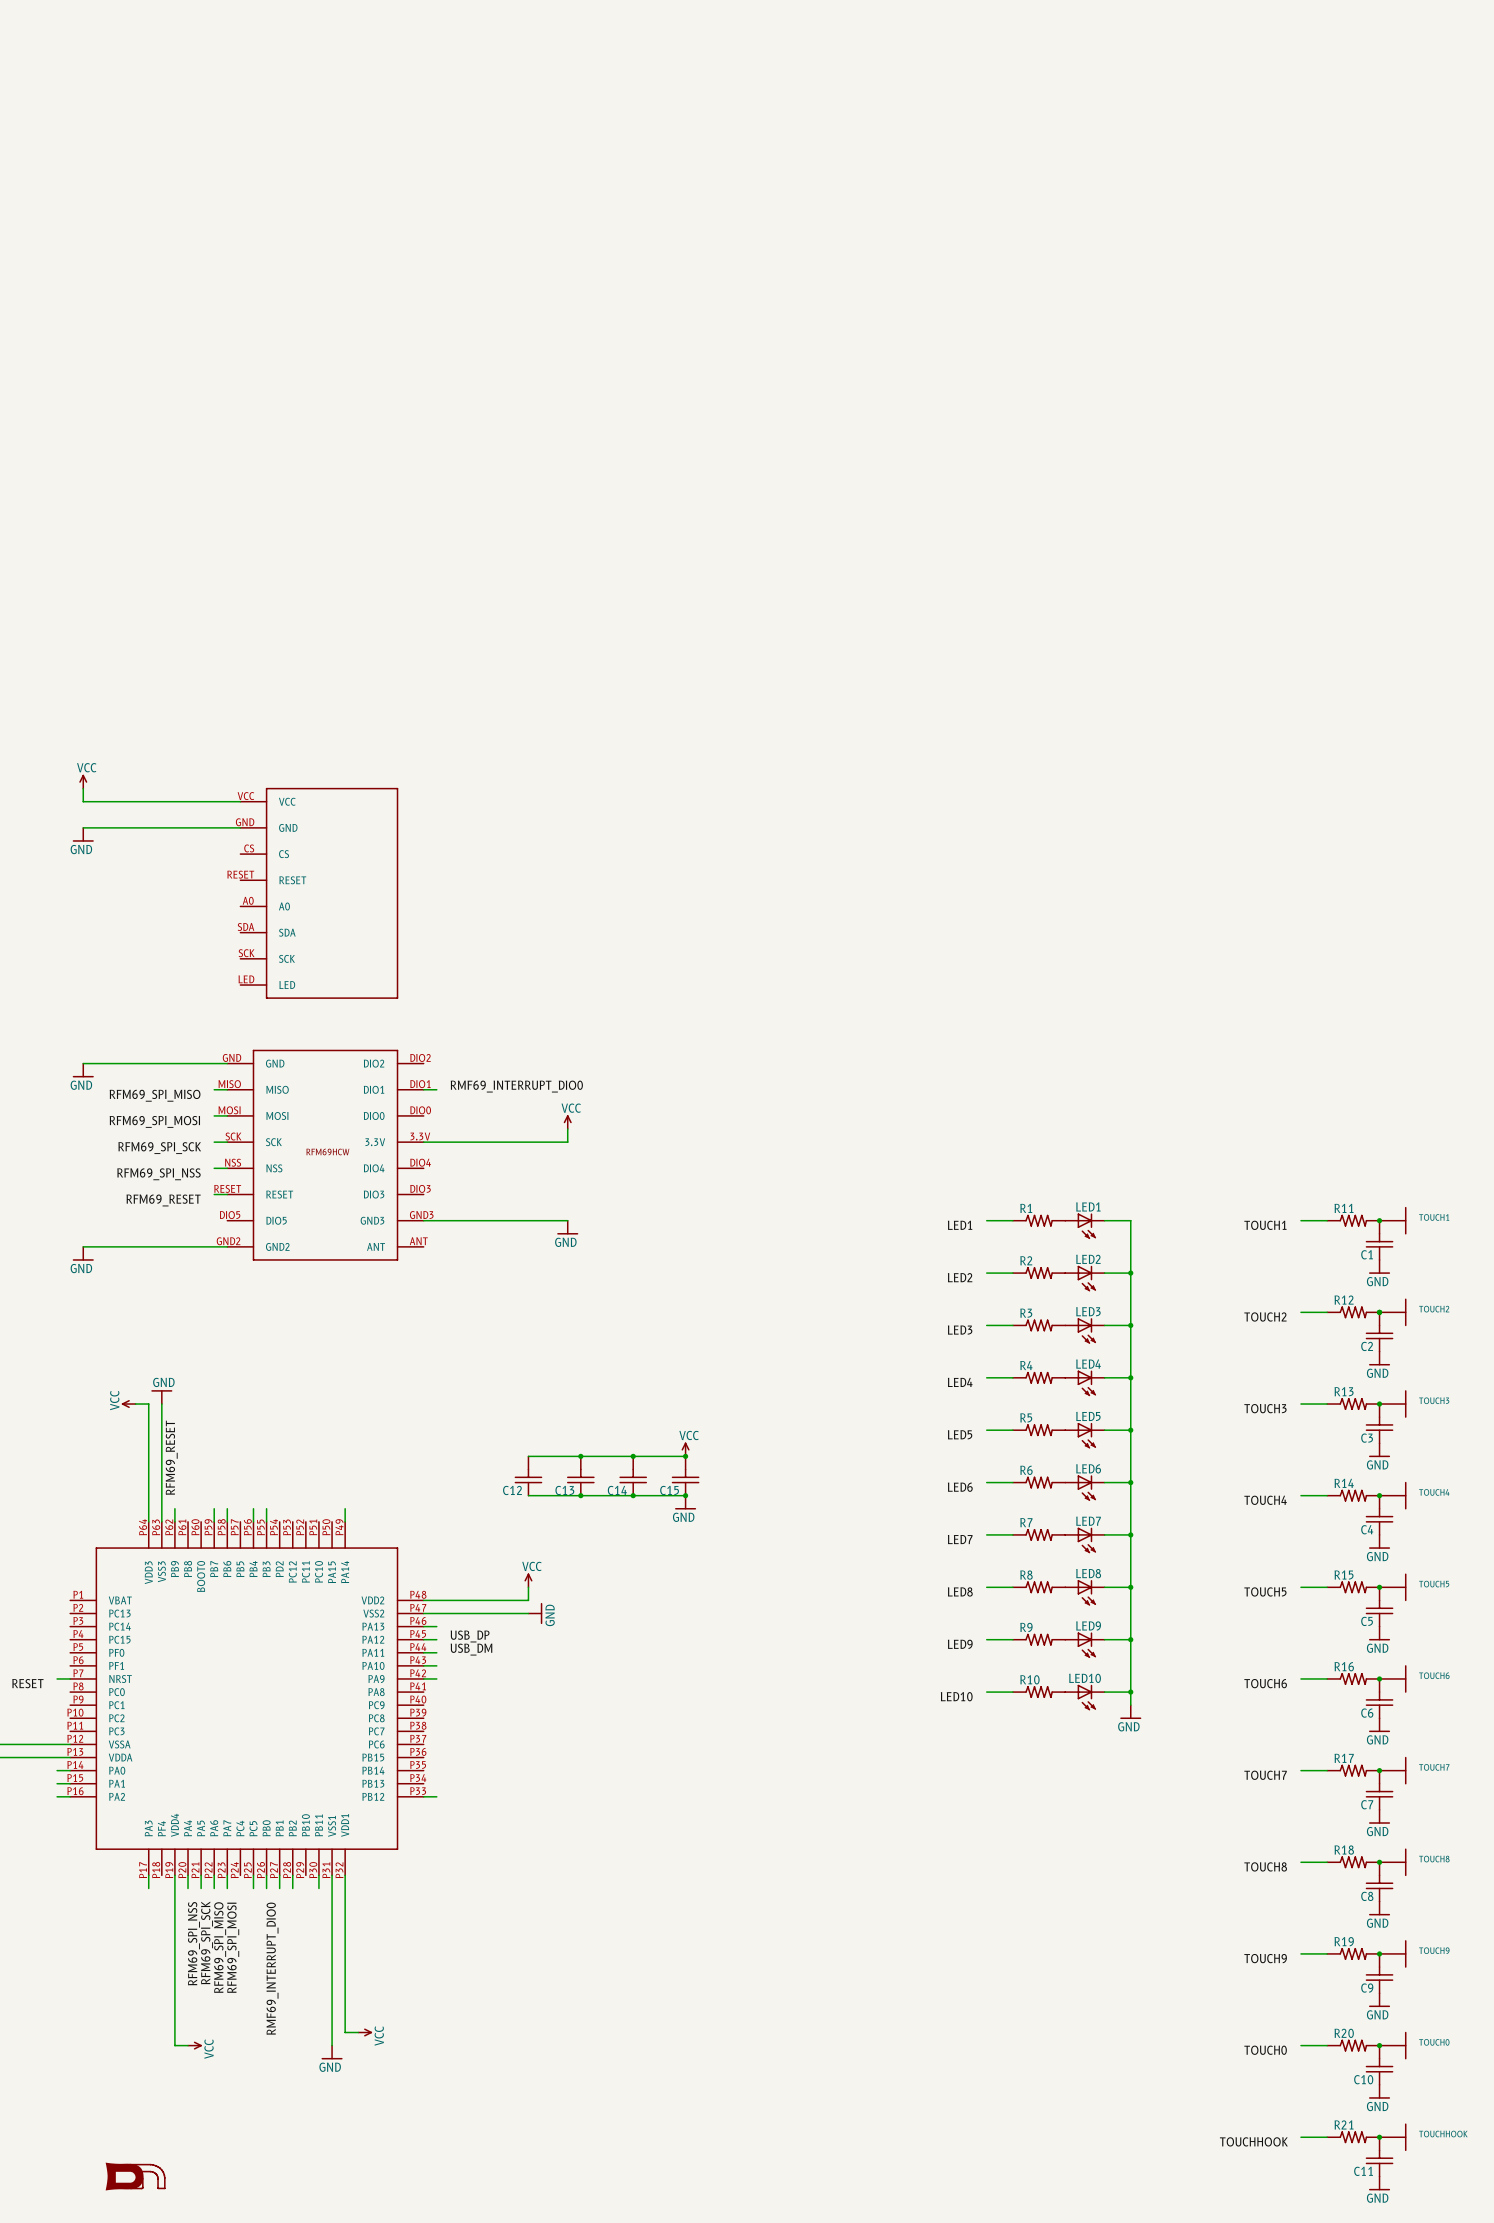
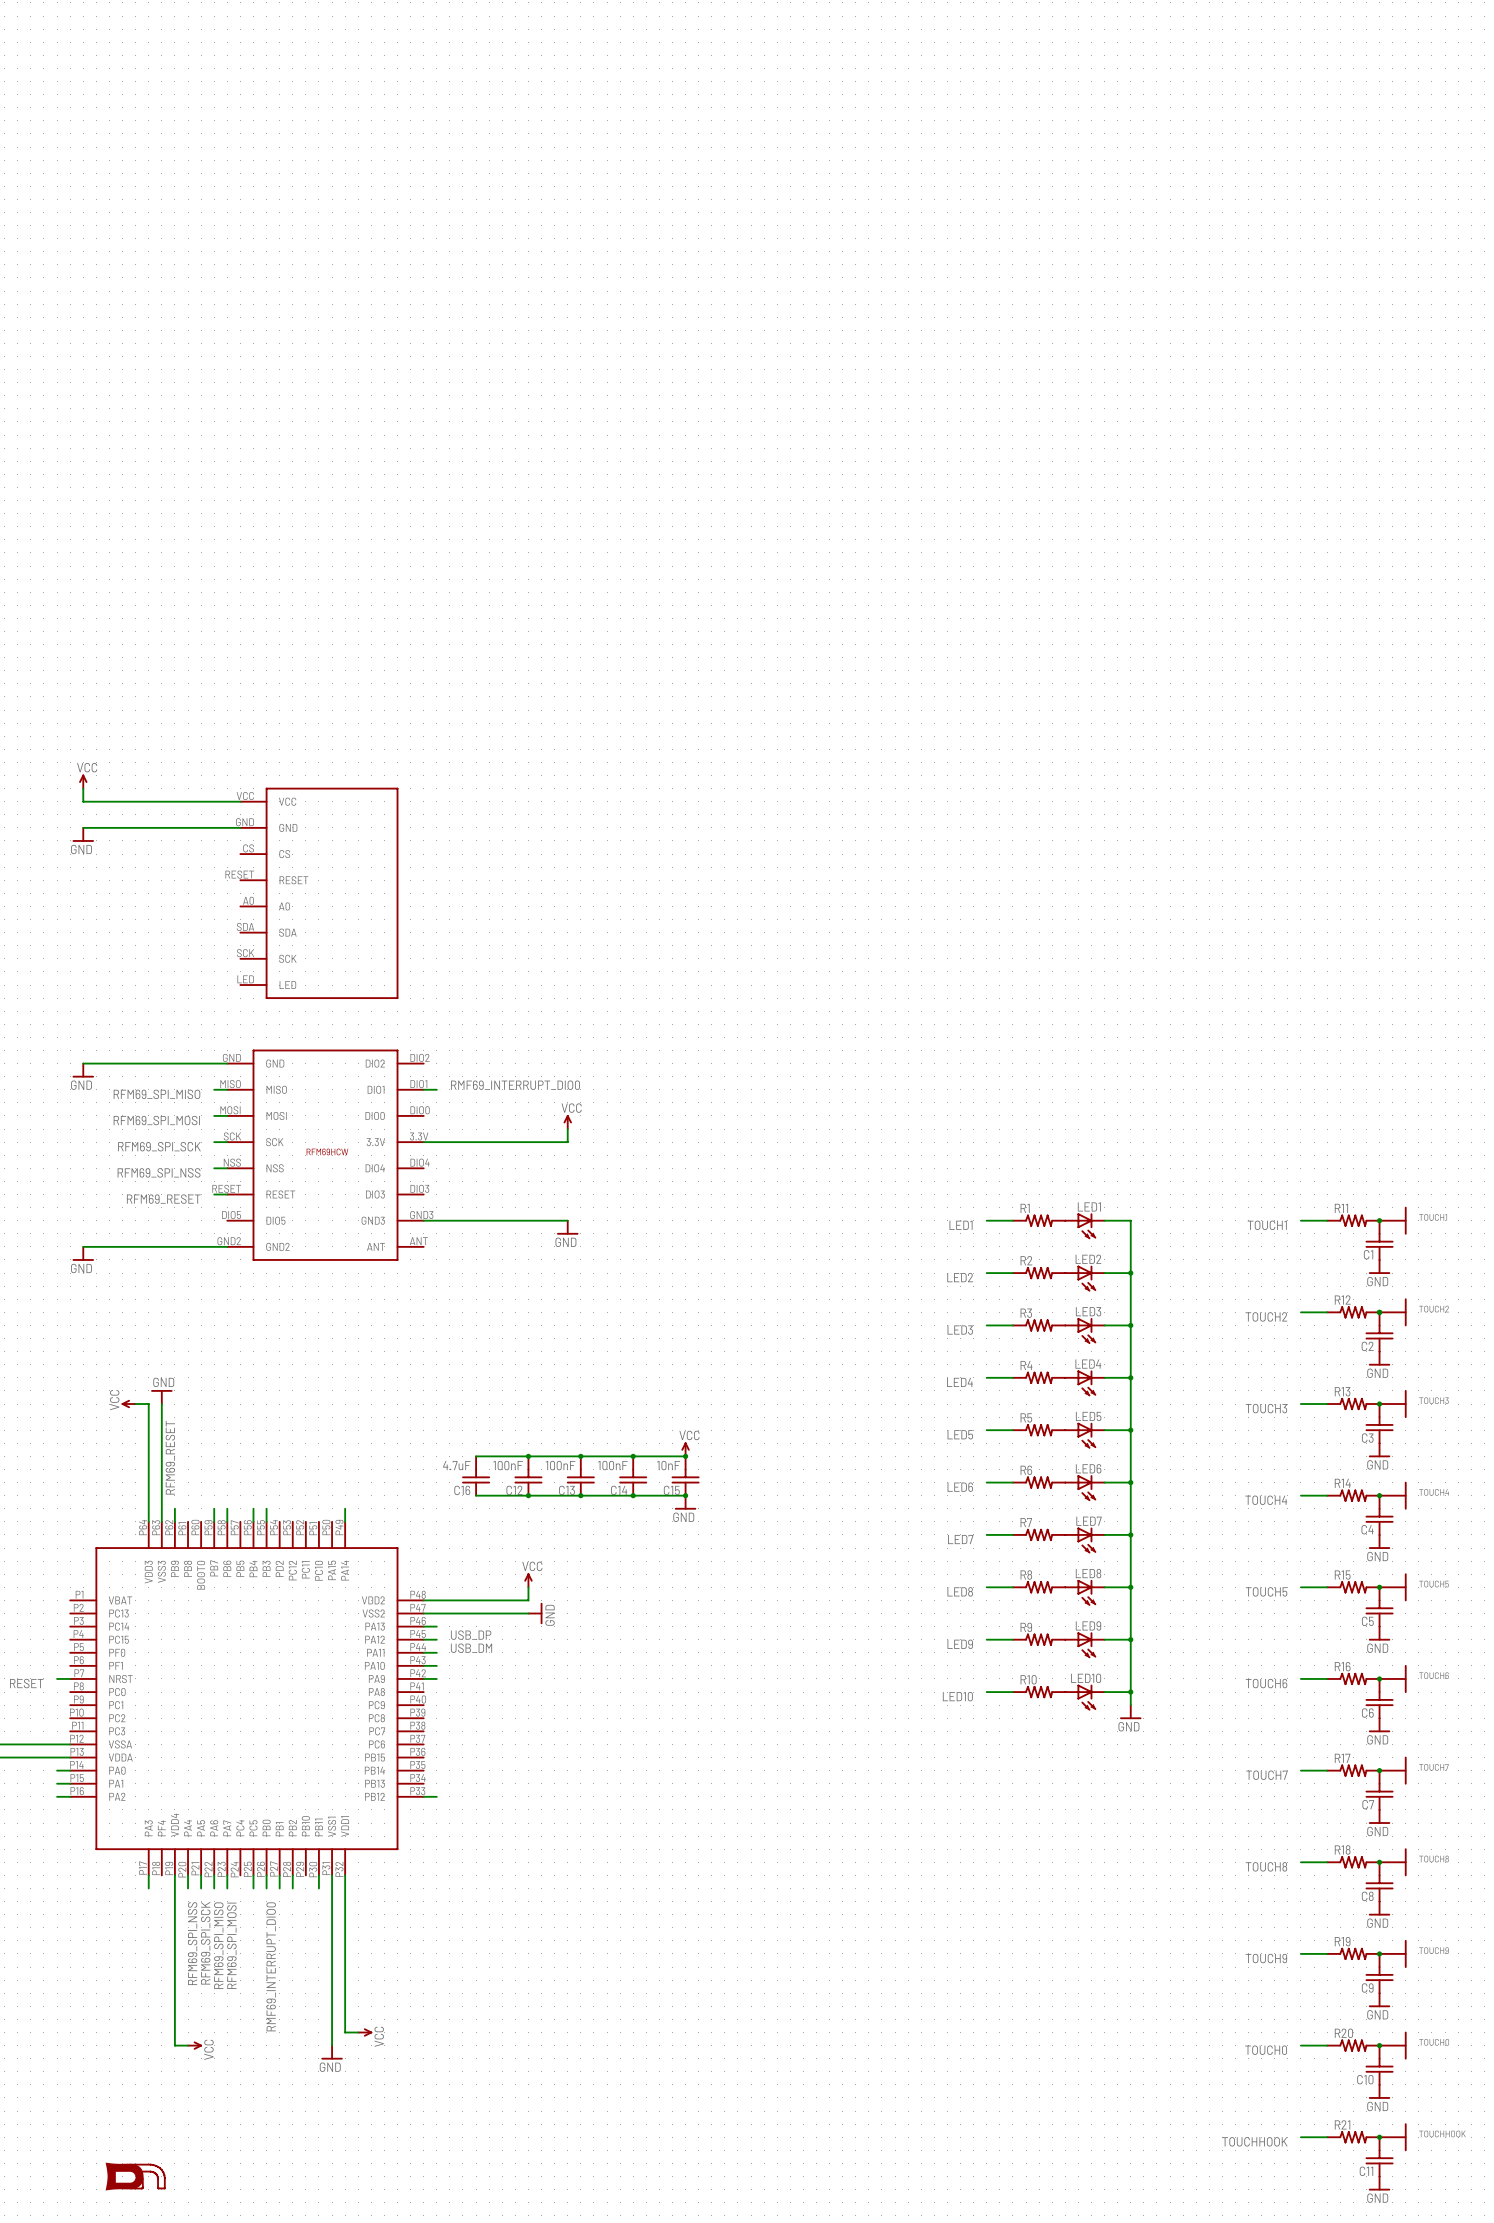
wire: none -> (476, 1456) (528, 1456)
junction: none -> (528, 1456)
C12 value: none -> 100nF (508, 1465)
C13 value: none -> 100nF (560, 1465)
C14 value: none -> 100nF (612, 1465)
C15 value: none -> 10nF (668, 1465)
C16: none -> 4.7uF (476, 1476)
wire: none -> (476, 1495) (528, 1495)
junction: none -> (528, 1495)

